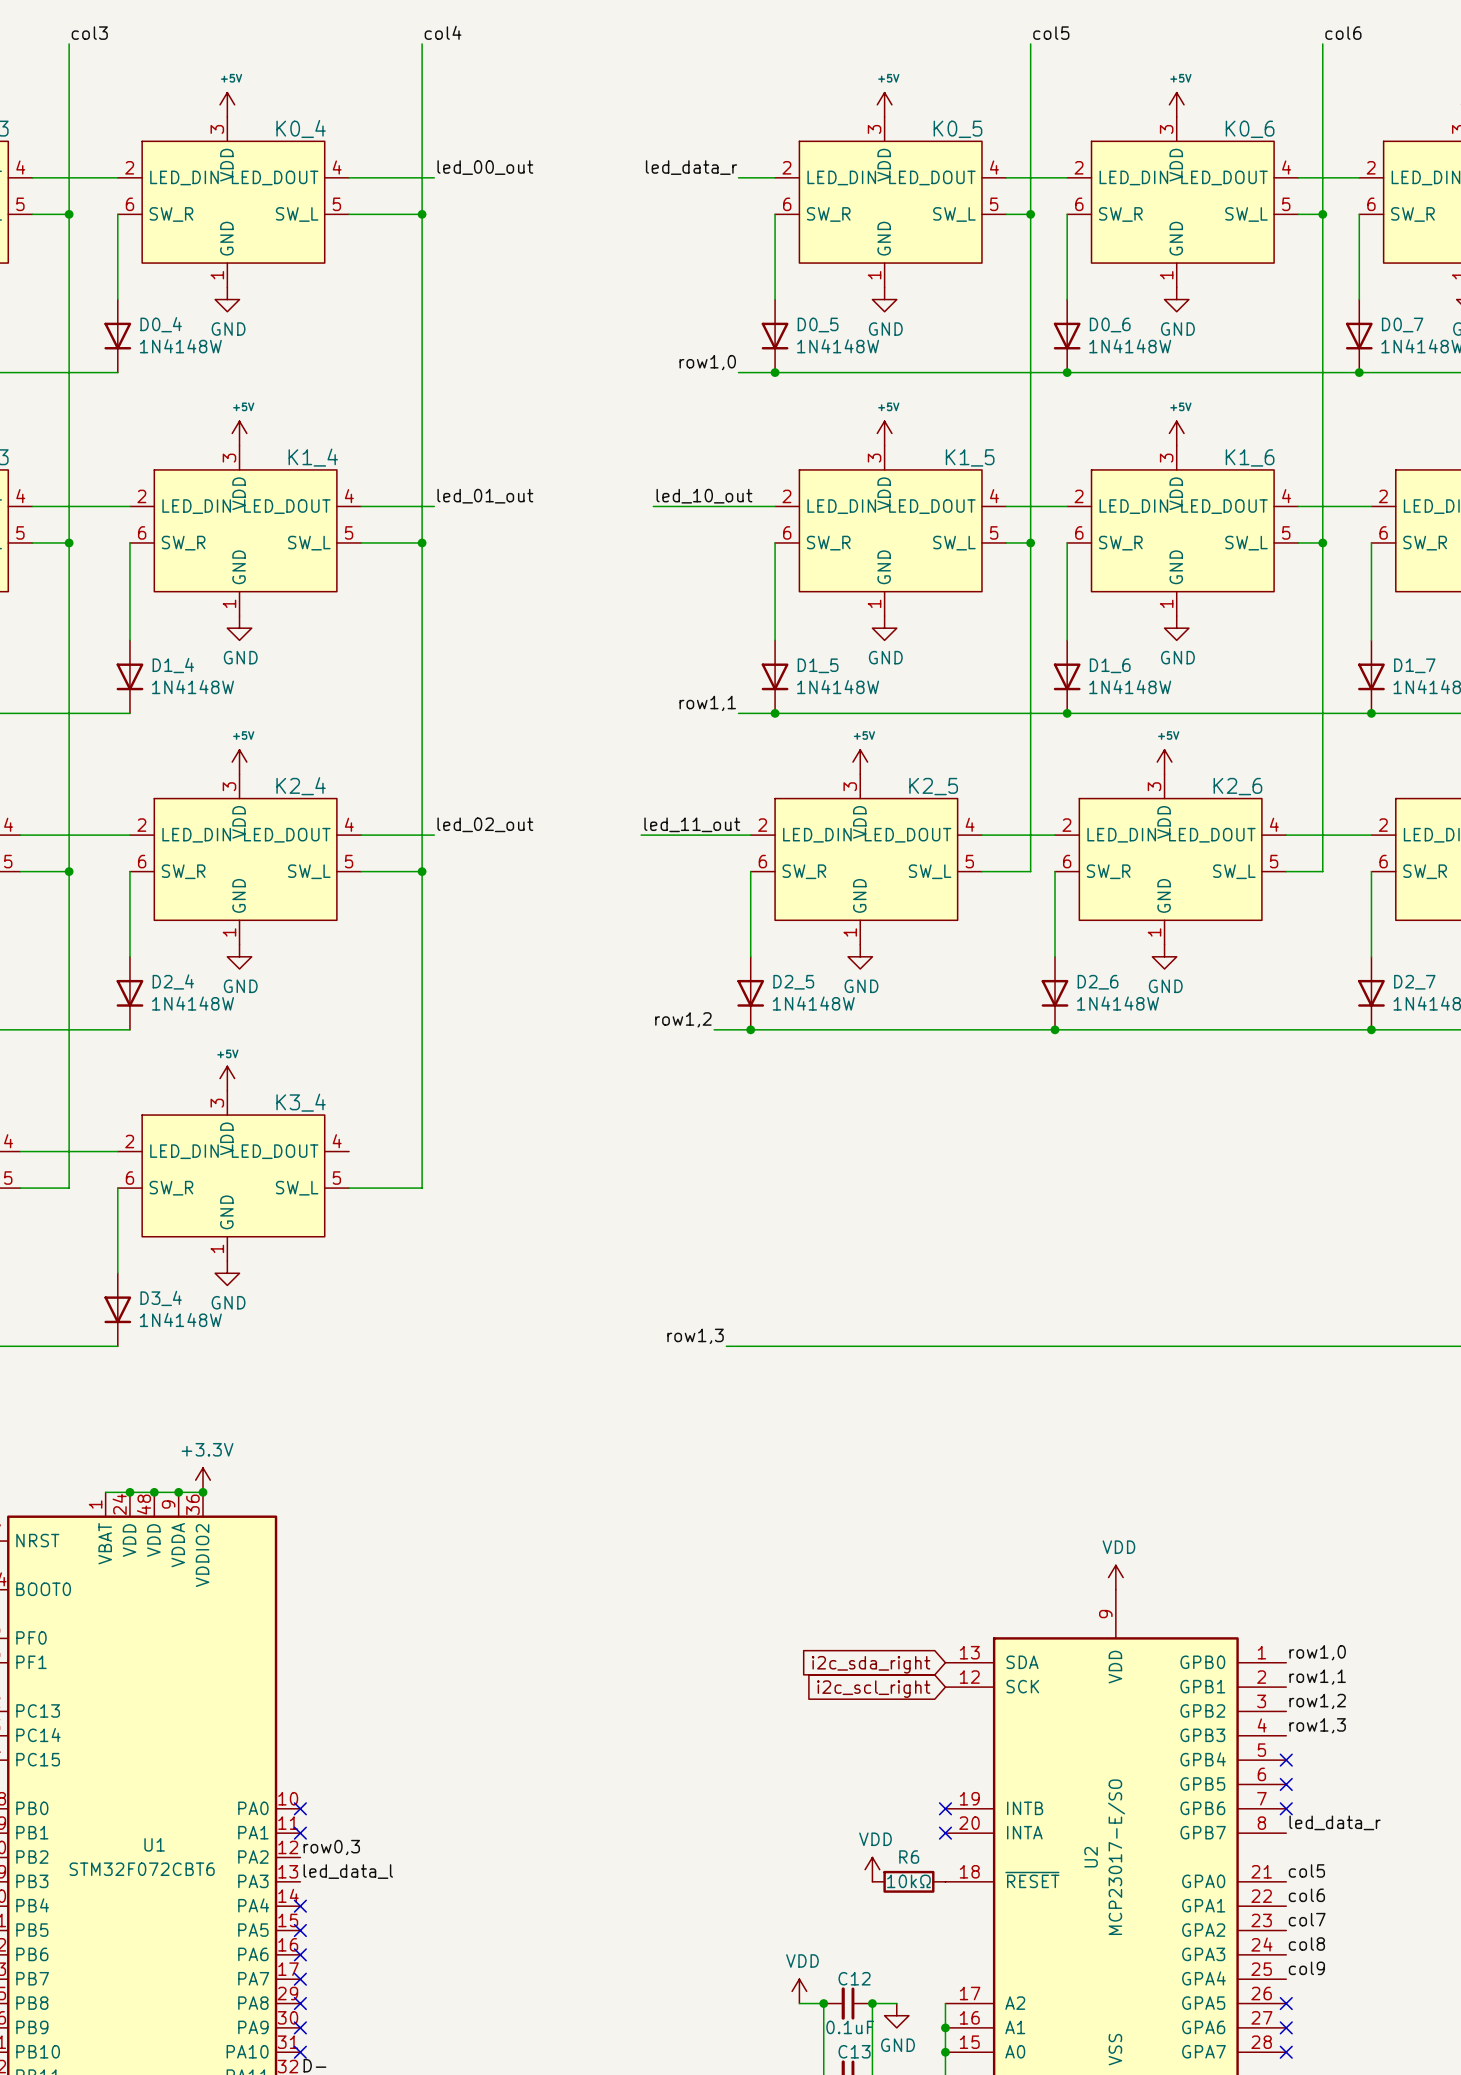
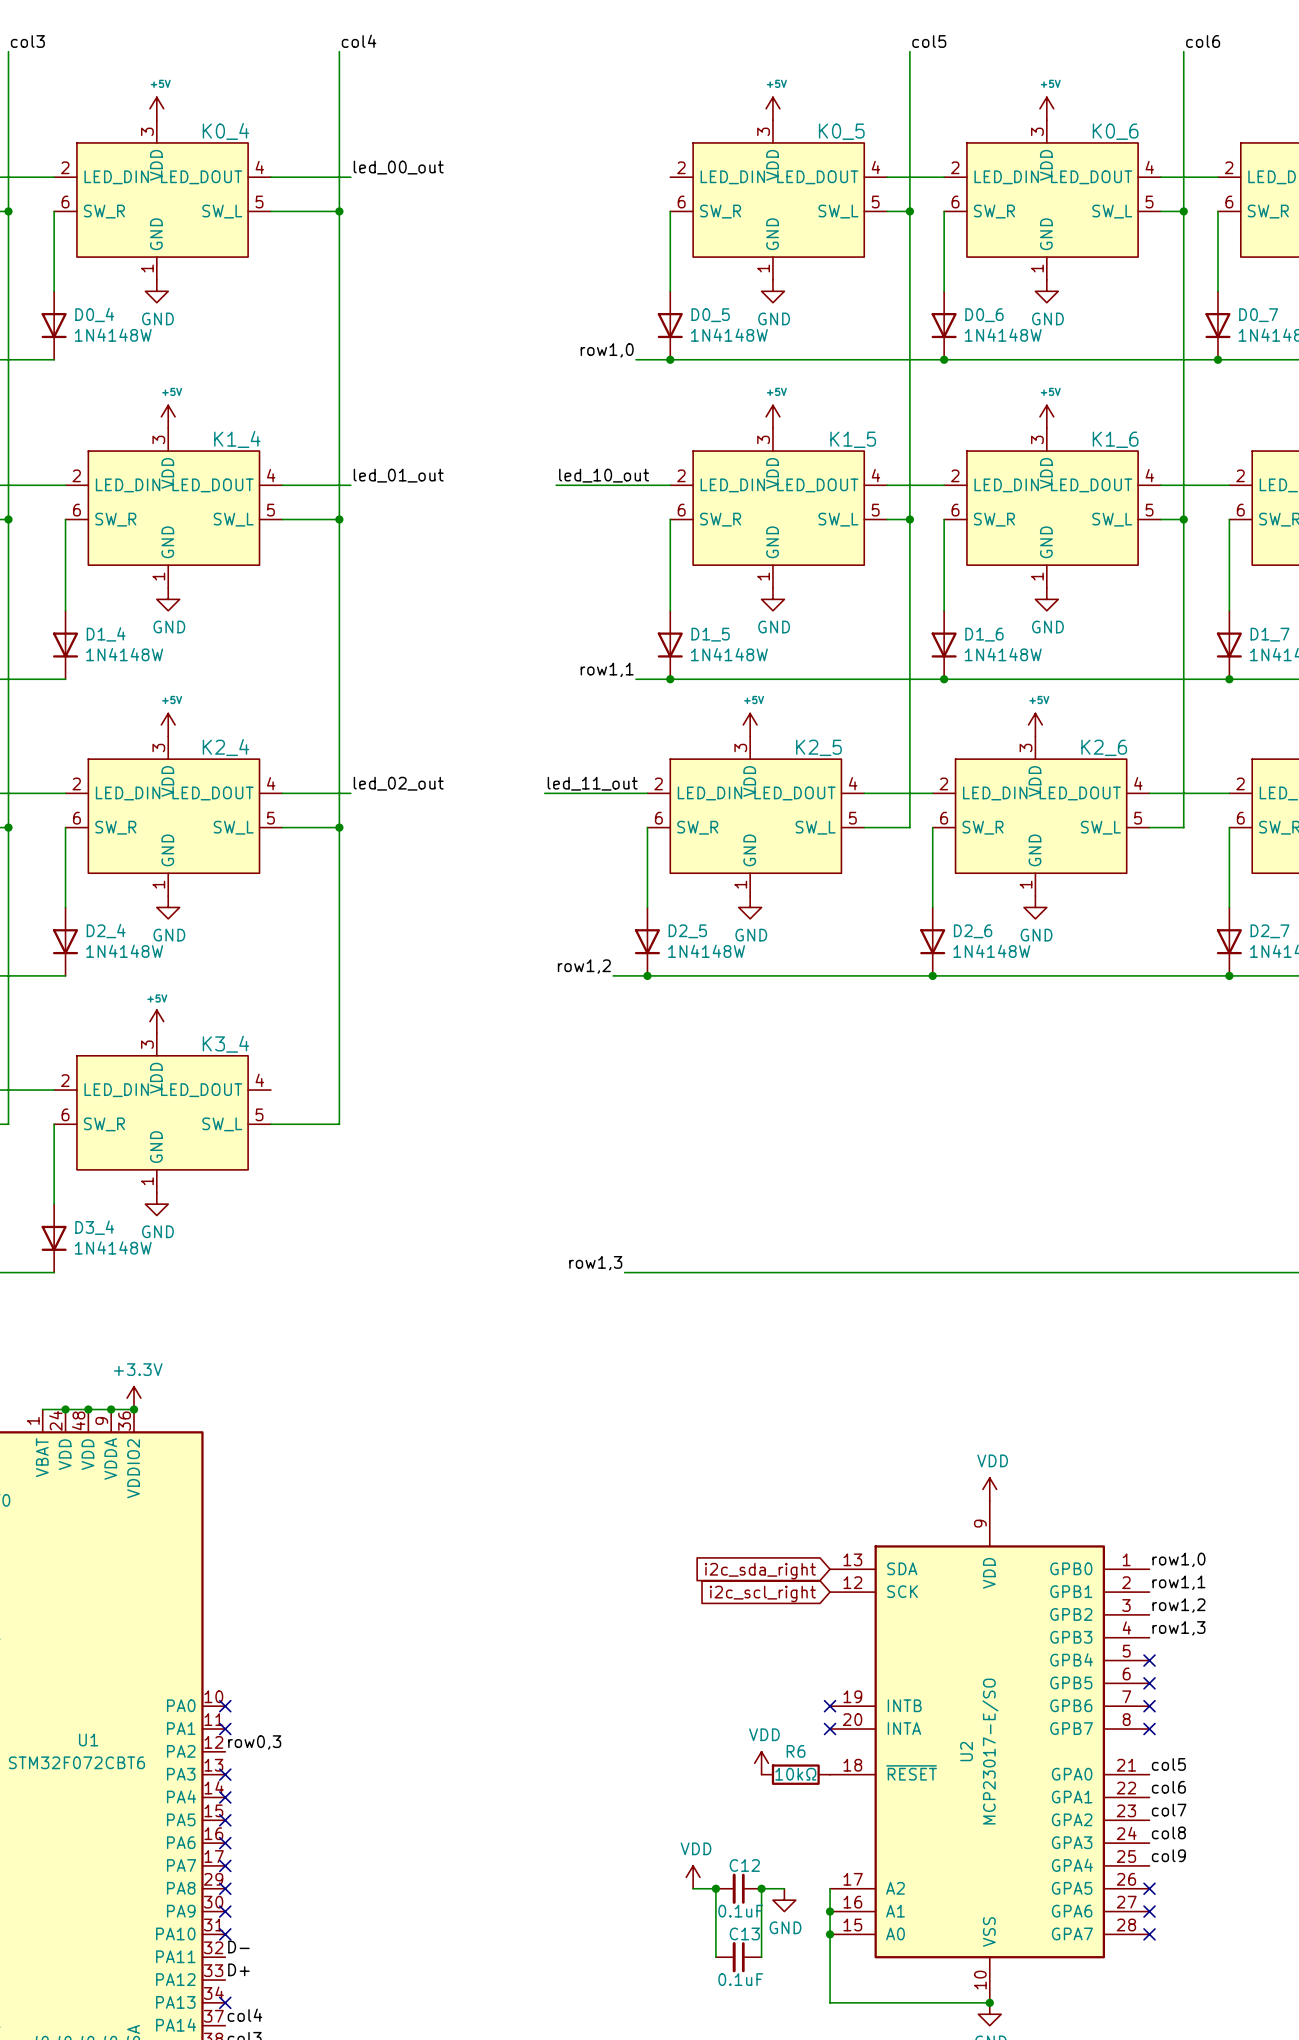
label: led_data_r (691, 167) -> none
wire: (738, 177) (775, 177) -> none
label: led_data_r (1335, 1822) -> none
no-connect mark: none -> (1149, 1729)
label: led_data_l (348, 1871) -> none
no-connect mark: none -> (225, 1774)

